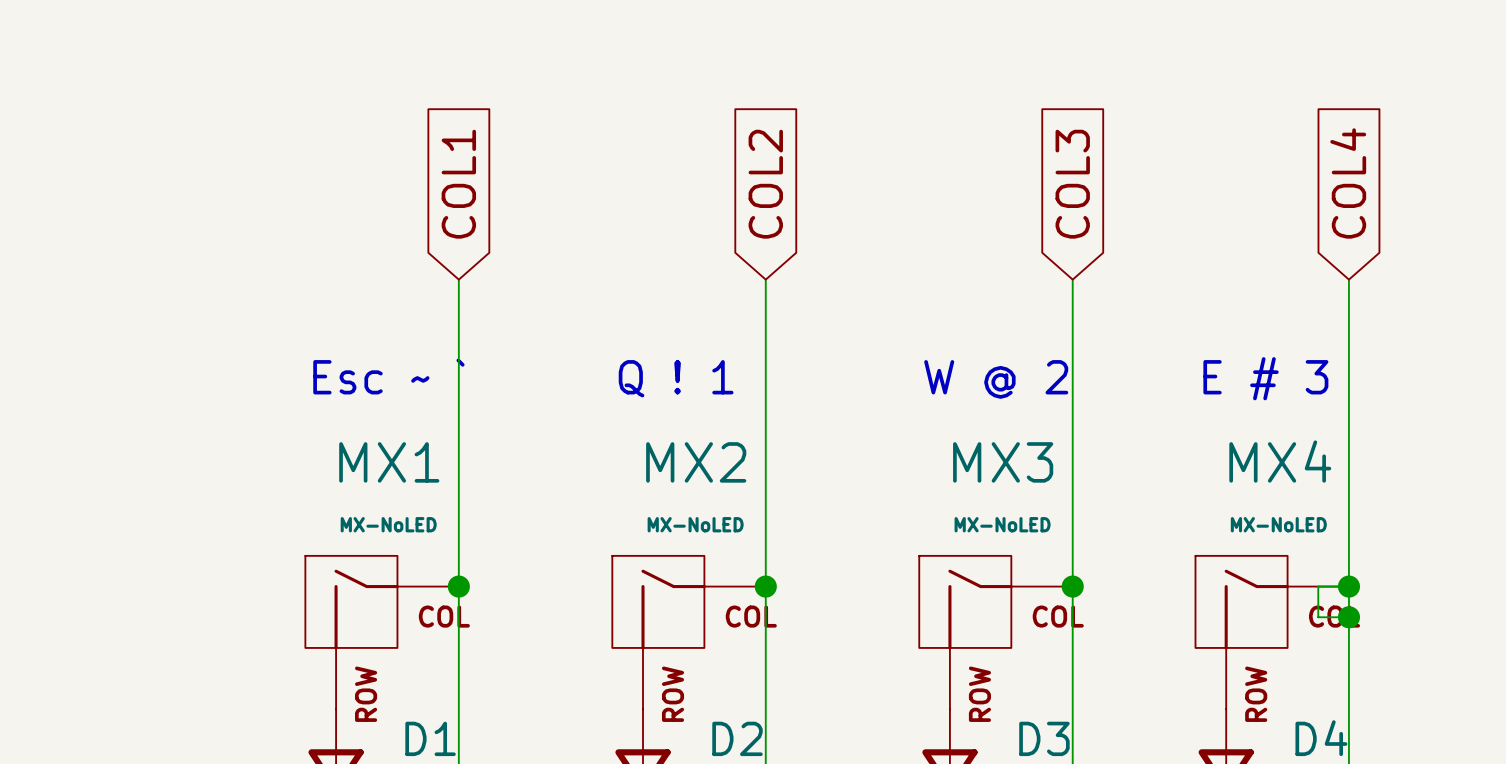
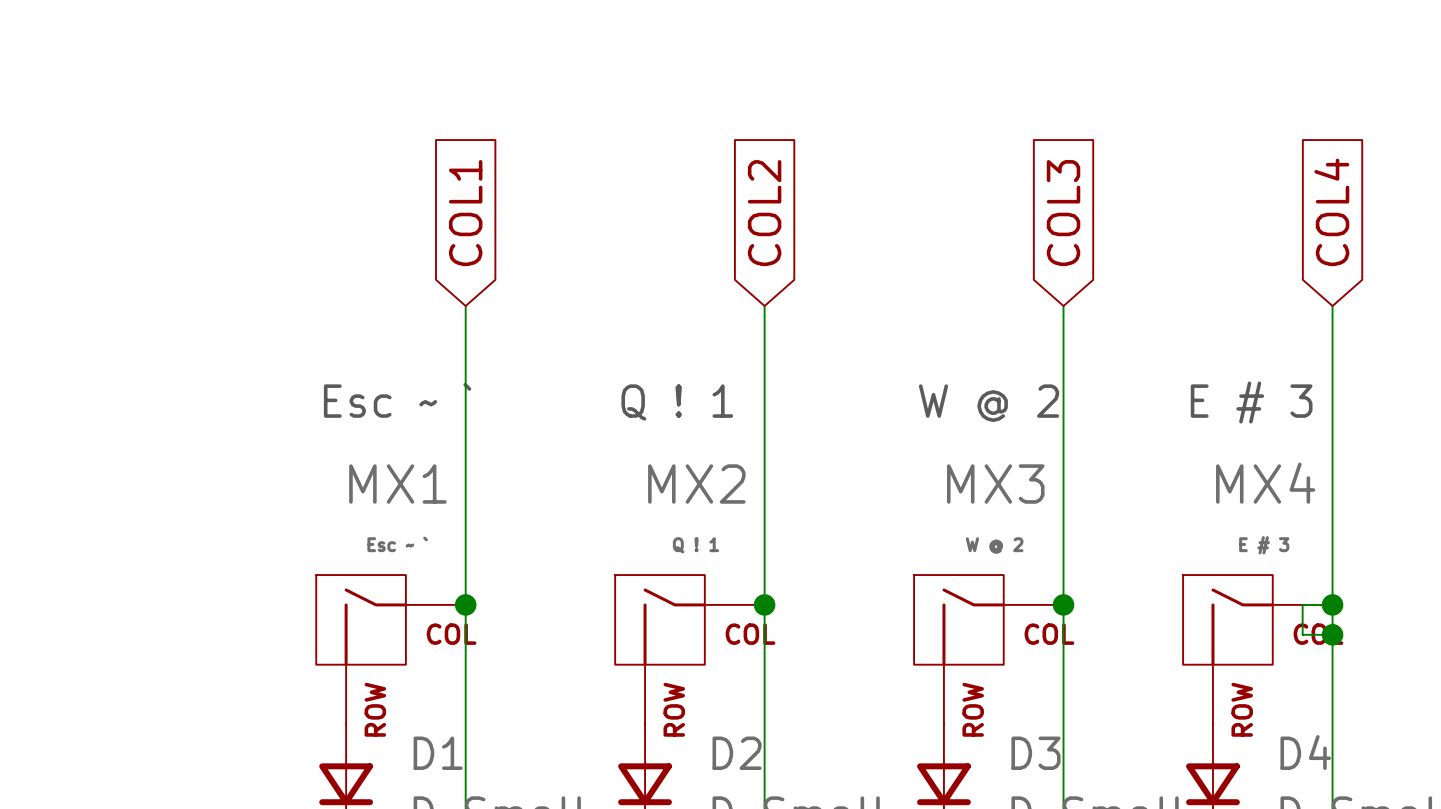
MX1 value: MX-NoLED (388, 524) -> Esc ~ ` (397, 544)
MX2 value: MX-NoLED (695, 524) -> Q ! 1 (696, 545)
MX3 value: MX-NoLED (1002, 524) -> W @ 2 (994, 545)
MX4 value: MX-NoLED (1278, 524) -> E # 3 (1264, 545)

